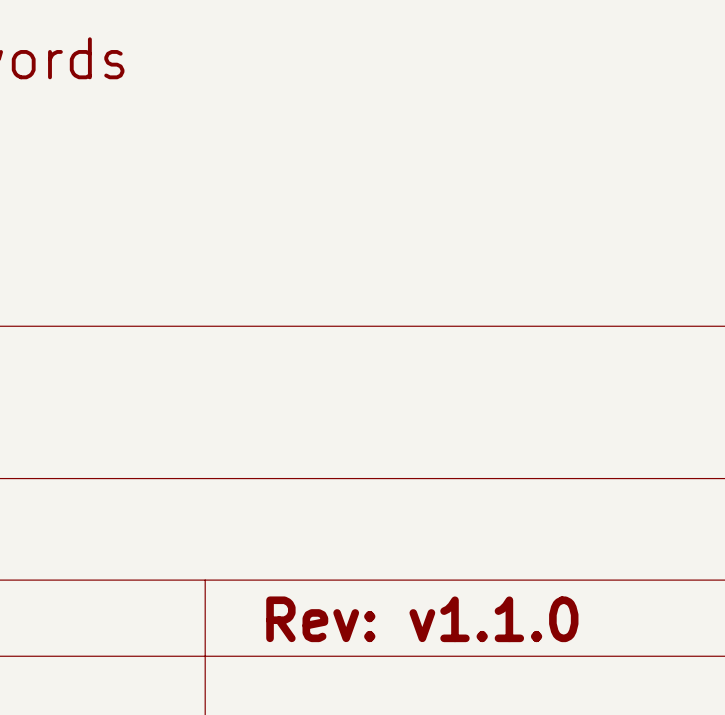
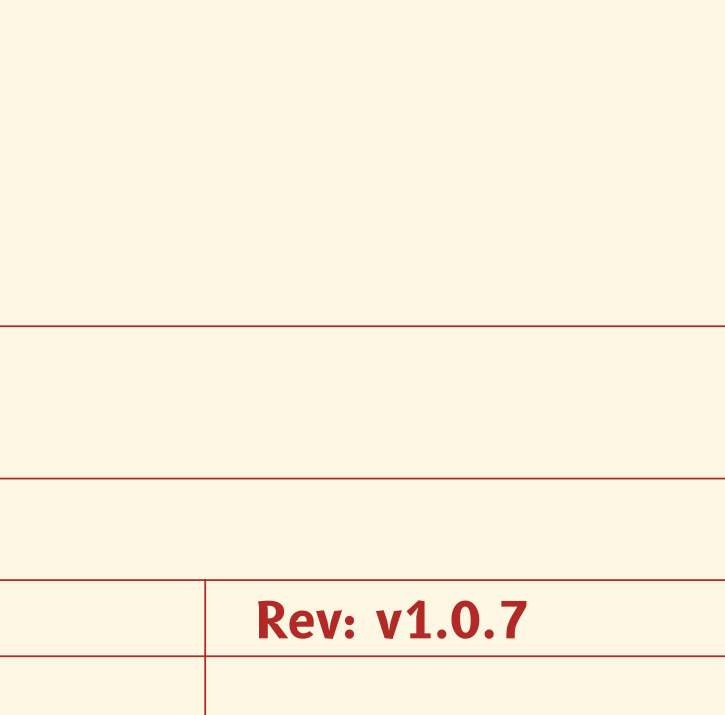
title block: Rev: v1.1.0 (422, 619) -> Rev: v1.0.7 (392, 619)

